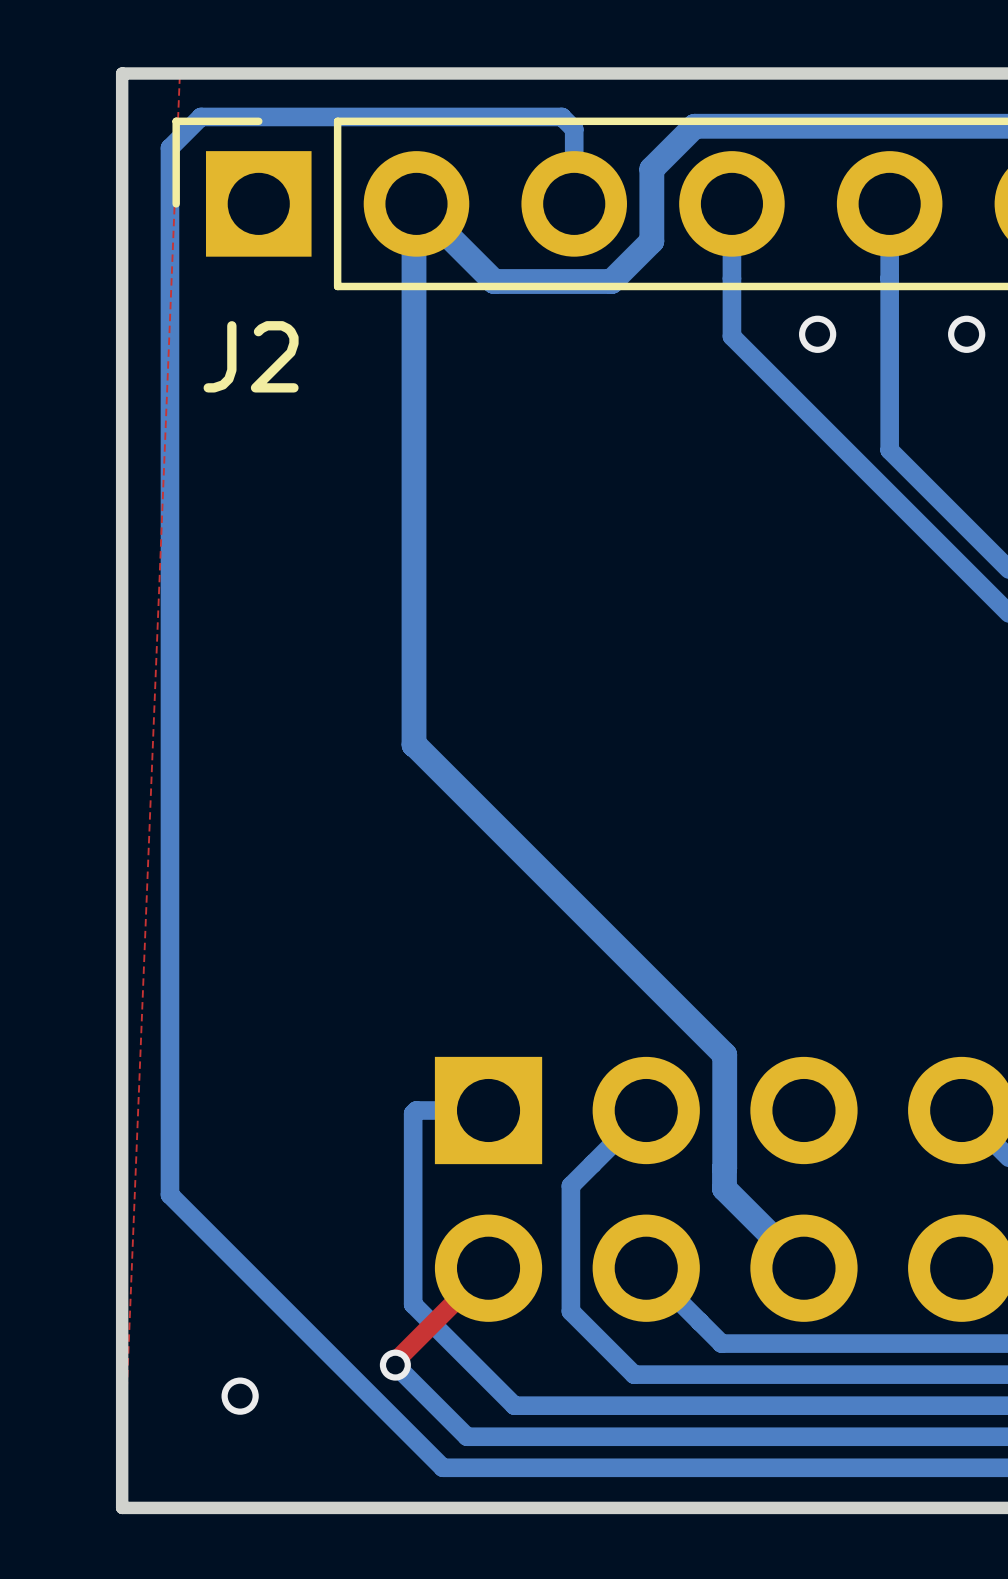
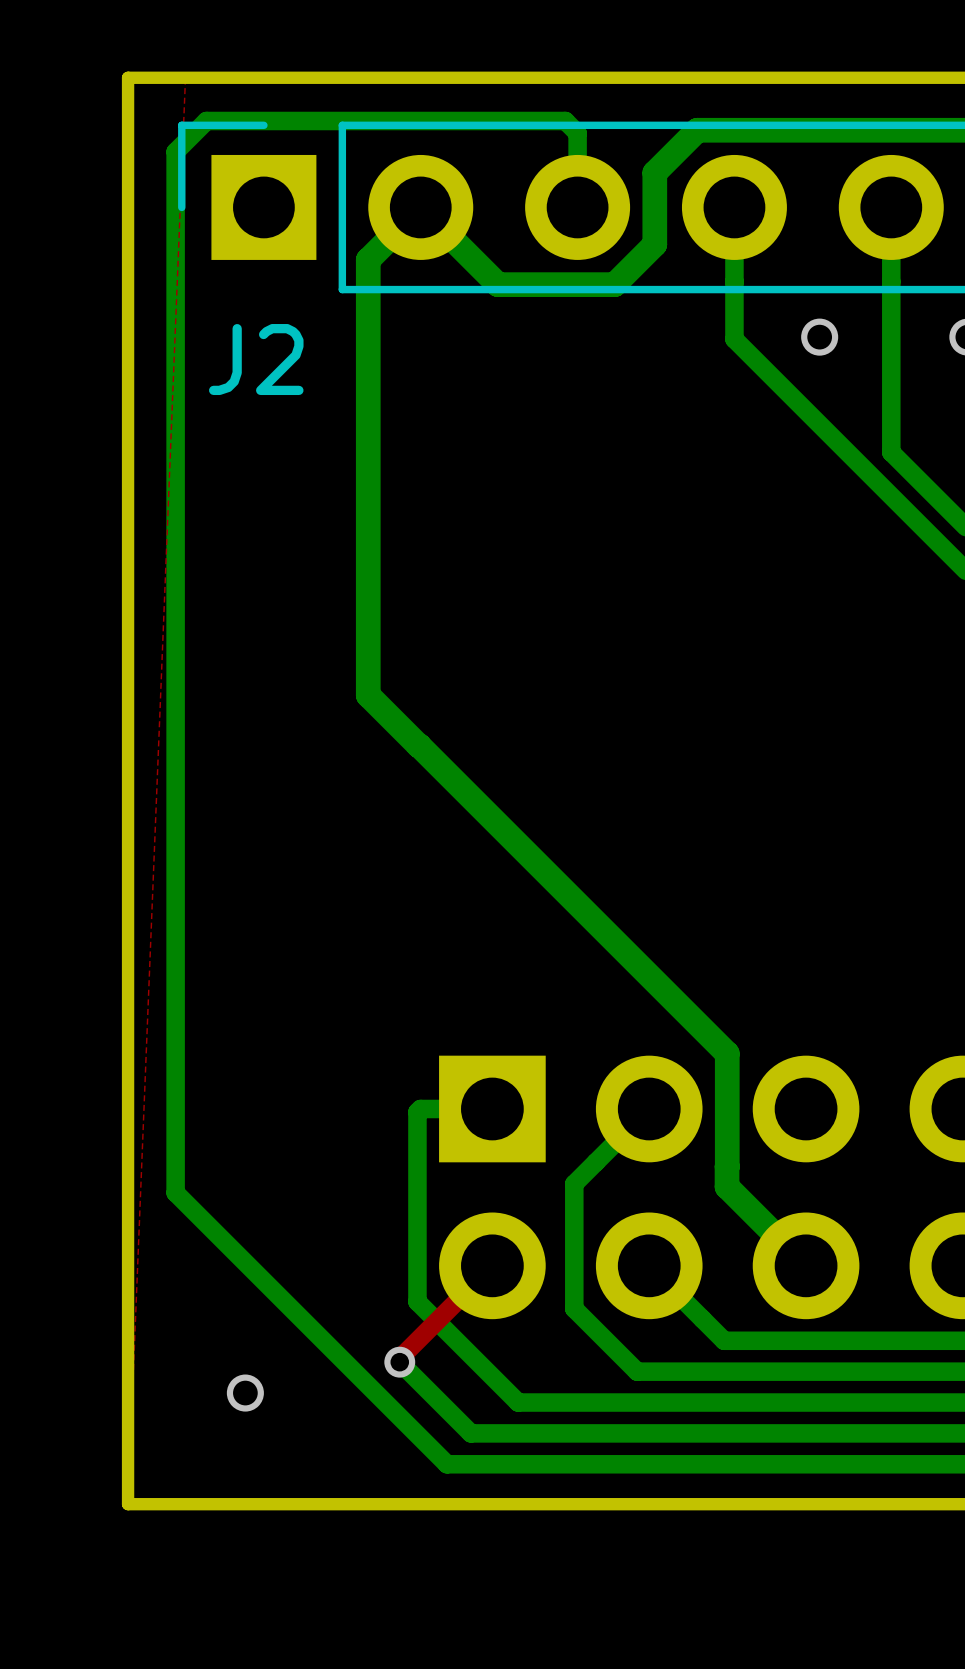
bottom track: (414, 206) (414, 744) -> (418, 209) (368, 259) (368, 695) (418, 745)

